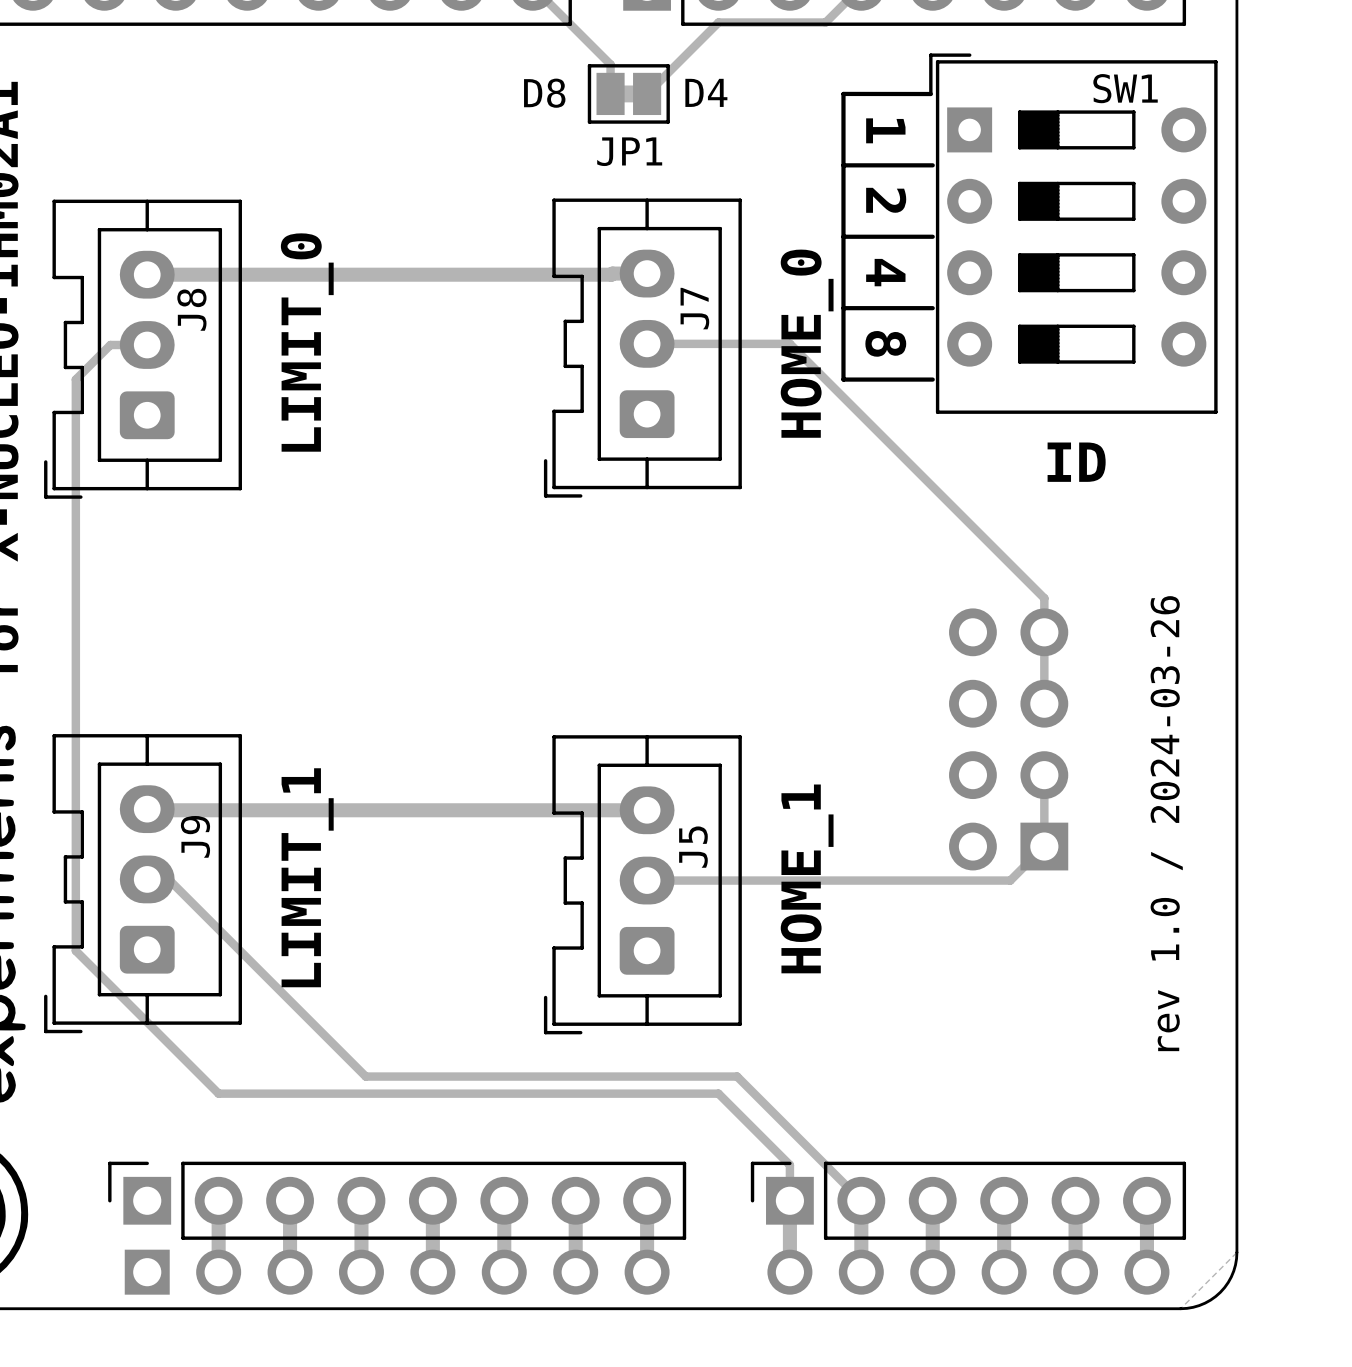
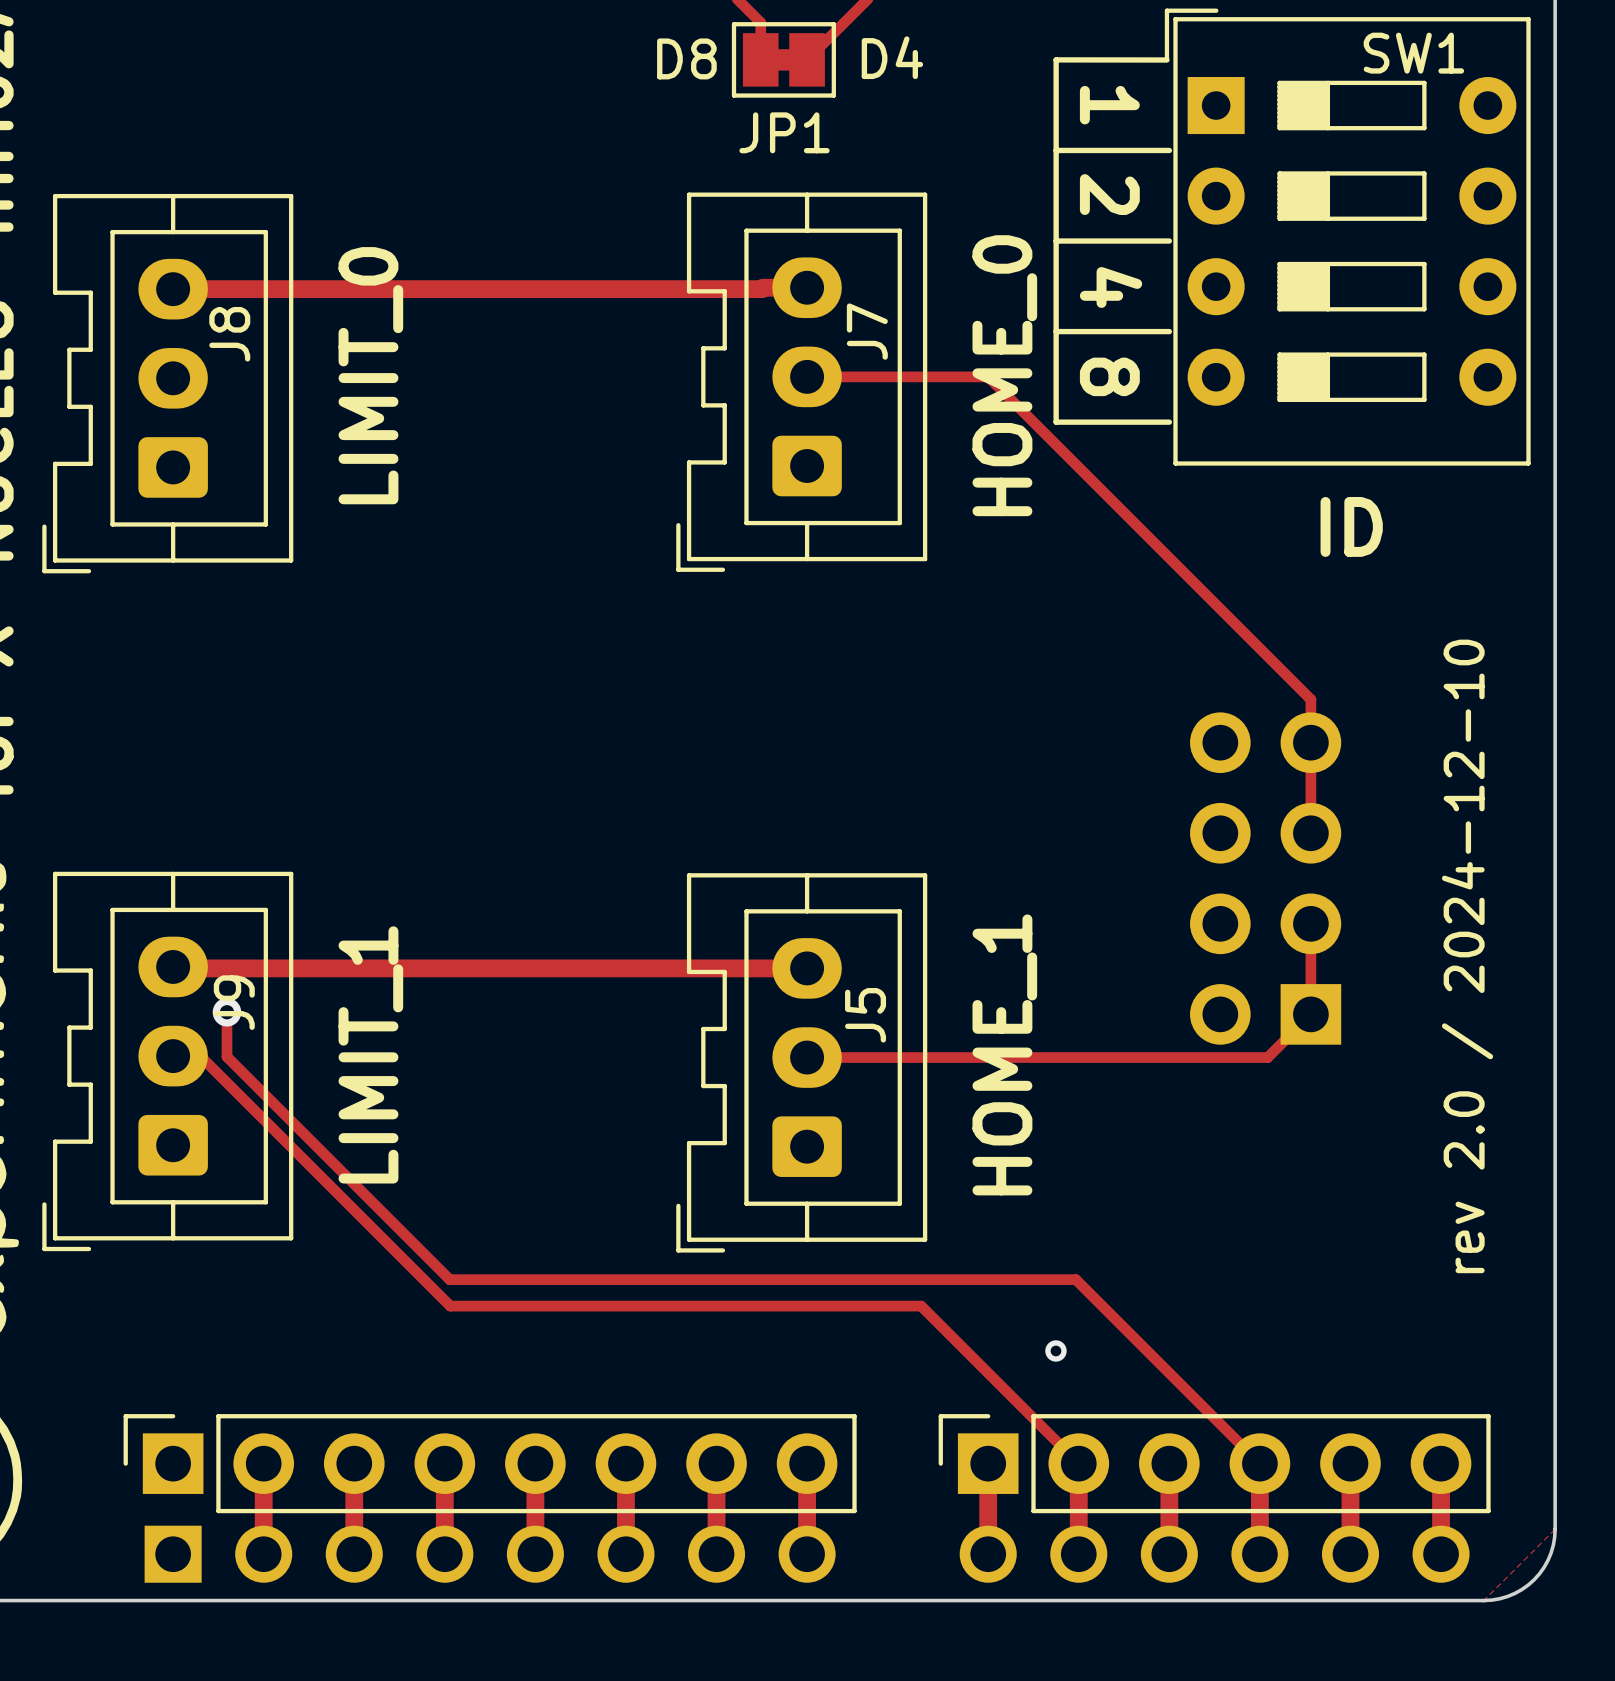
track: (147, 344) (110, 344) (75, 379) (75, 950) (218, 1093) (718, 1093) (789, 1165) (789, 1200) -> none
text: rev 1.0 / 2024-03-26 (1166, 823) -> rev 2.0 / 2024-12-10 (1467, 956)
track: none -> (226, 1012) (226, 1056) (449, 1279) (1075, 1279) (1259, 1463)
via: none -> (226, 1012)
via: none -> (1055, 1350)

